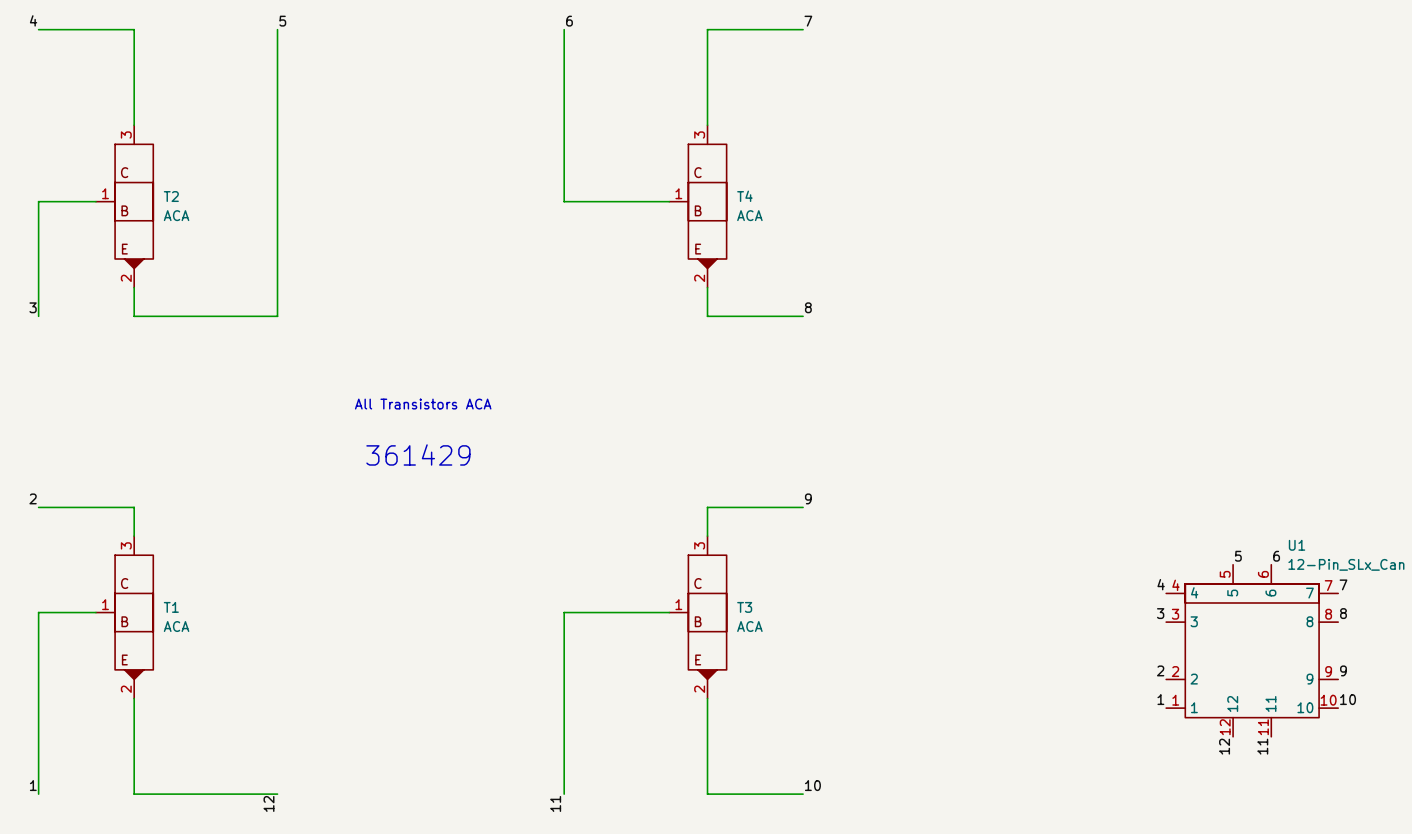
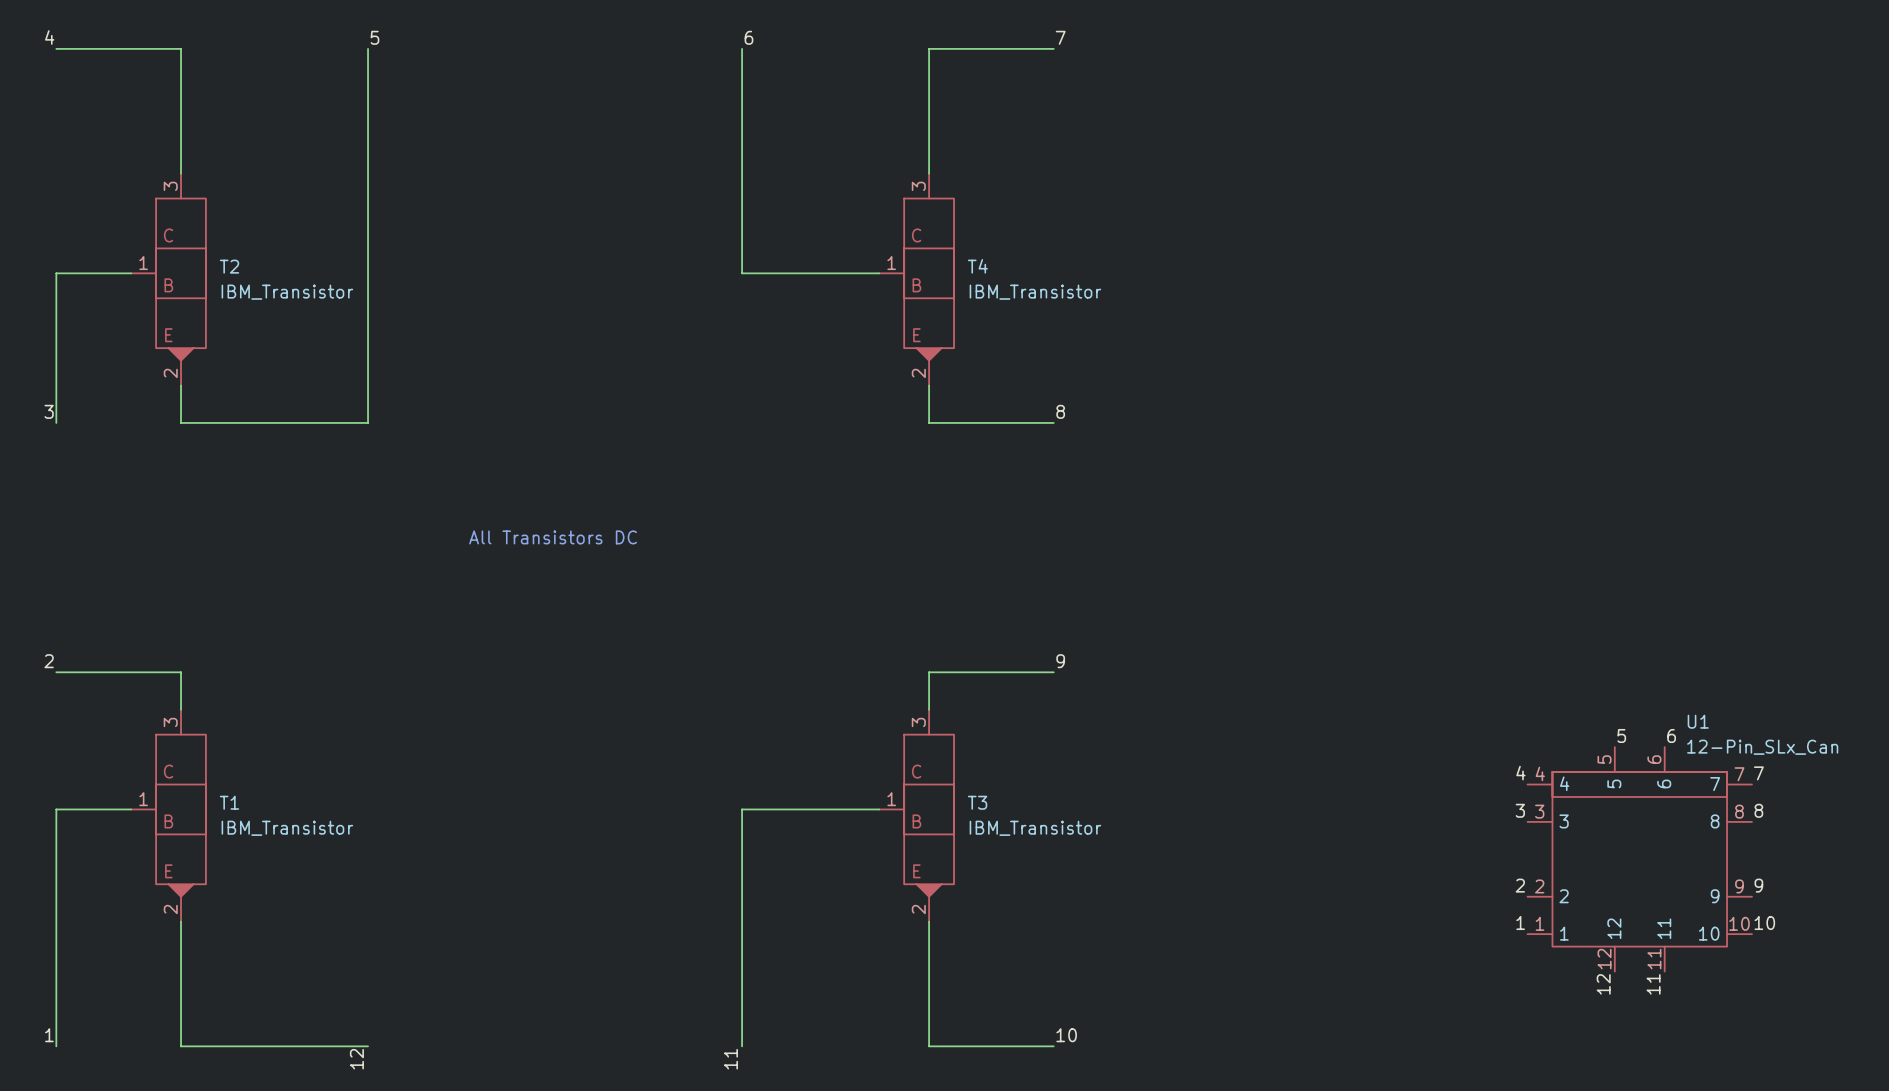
T2 value: ACA (176, 215) -> IBM_Transistor (287, 292)
T4 value: ACA (749, 215) -> IBM_Transistor (1035, 292)
text: All Transistors ACA (423, 404) -> All Transistors DC (553, 537)
text: 361429 (418, 454) -> none
T1 value: ACA (176, 626) -> IBM_Transistor (287, 828)
T3 value: ACA (749, 626) -> IBM_Transistor (1035, 828)

